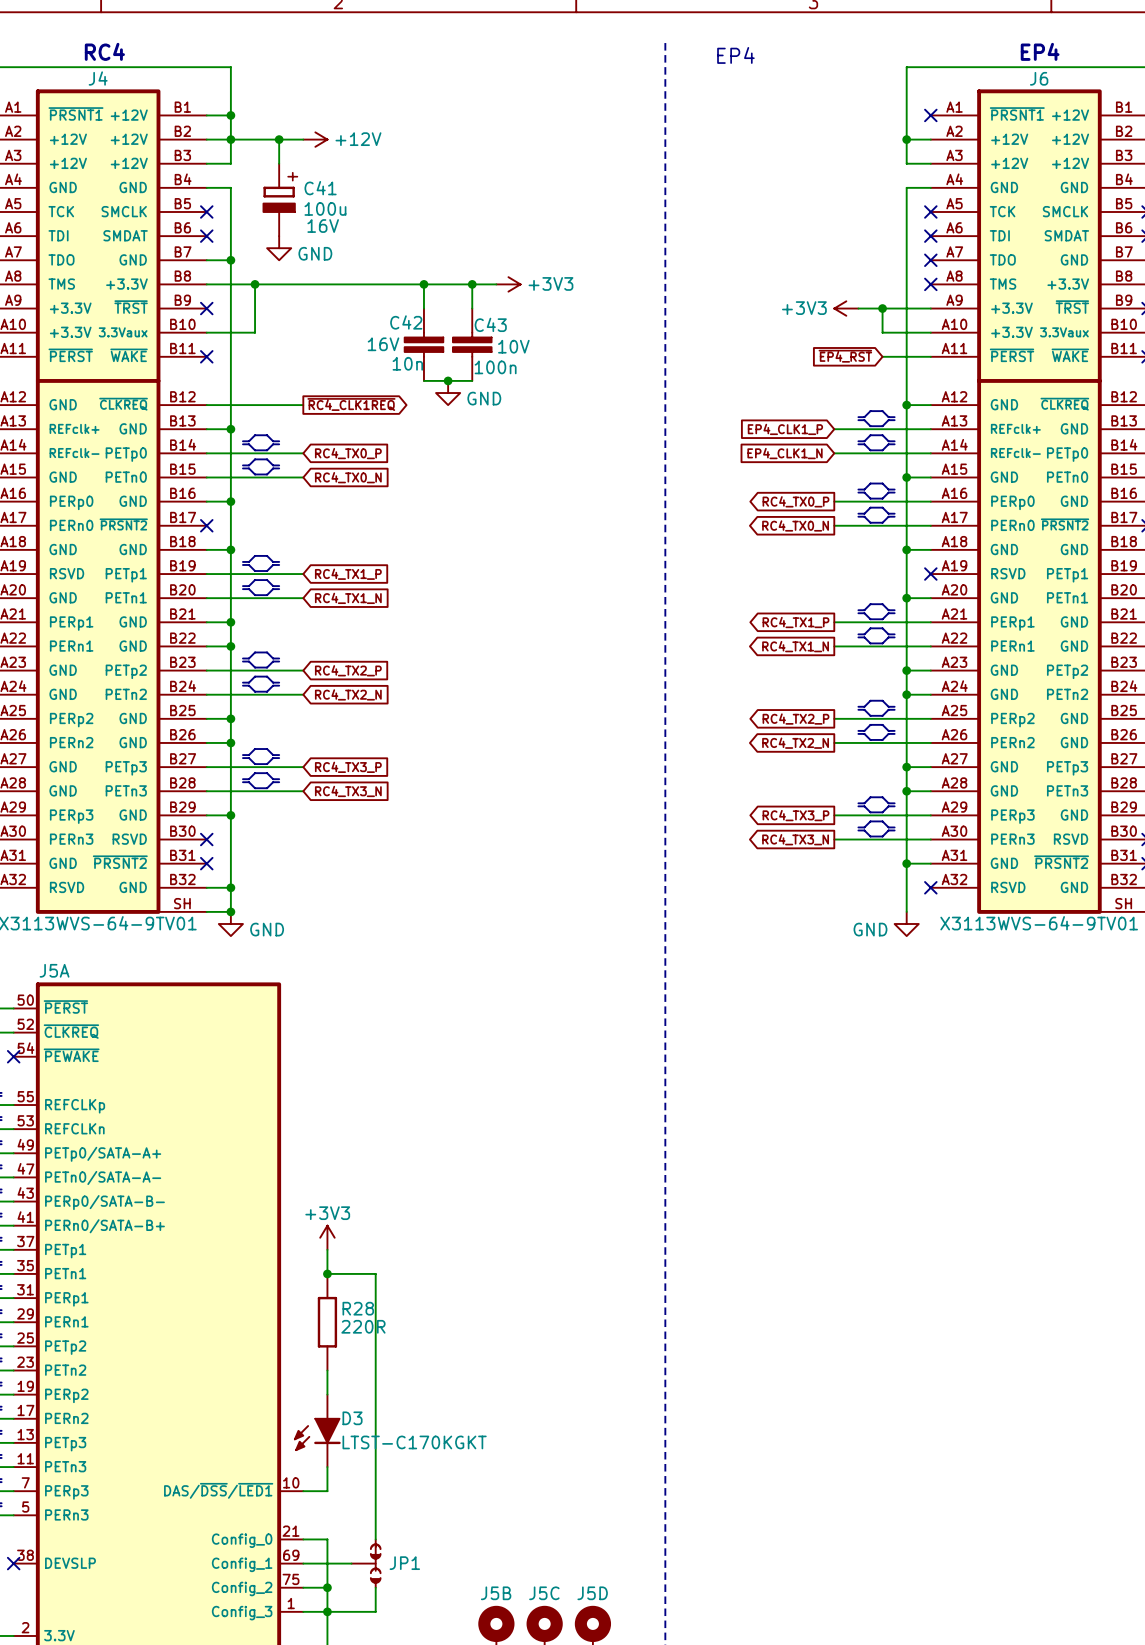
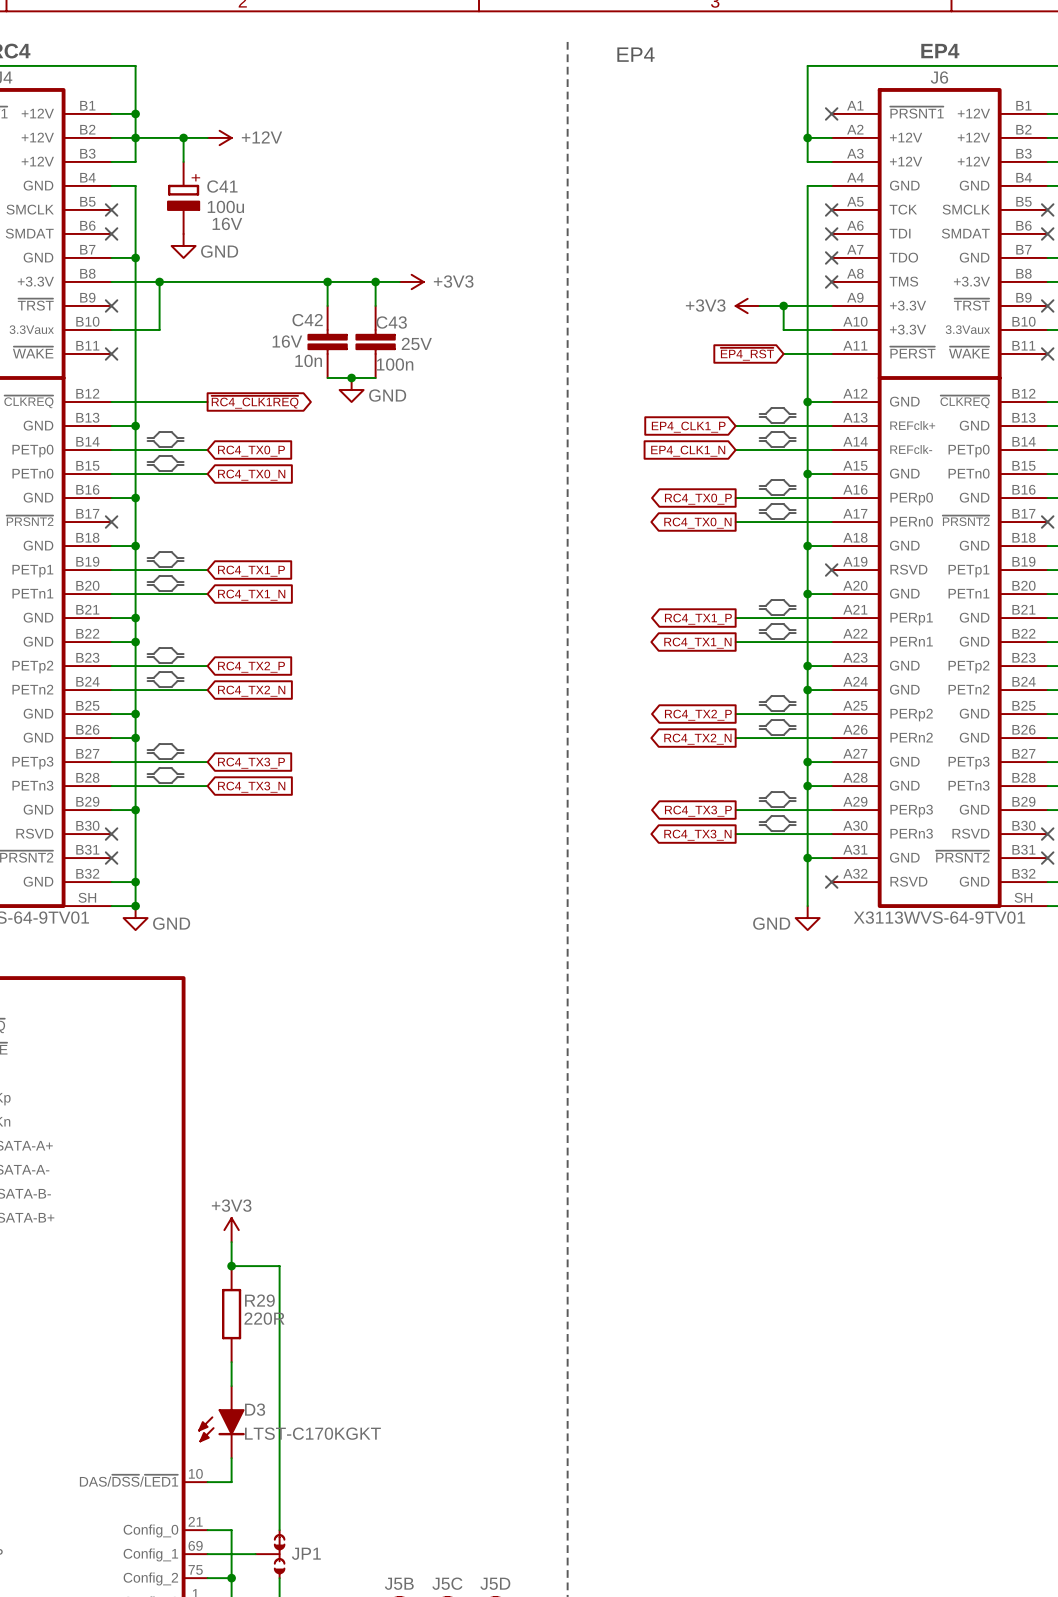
C43 text: 10V (513, 346) -> 25V (416, 343)
R28 name: R28 (358, 1308) -> R29 (259, 1300)

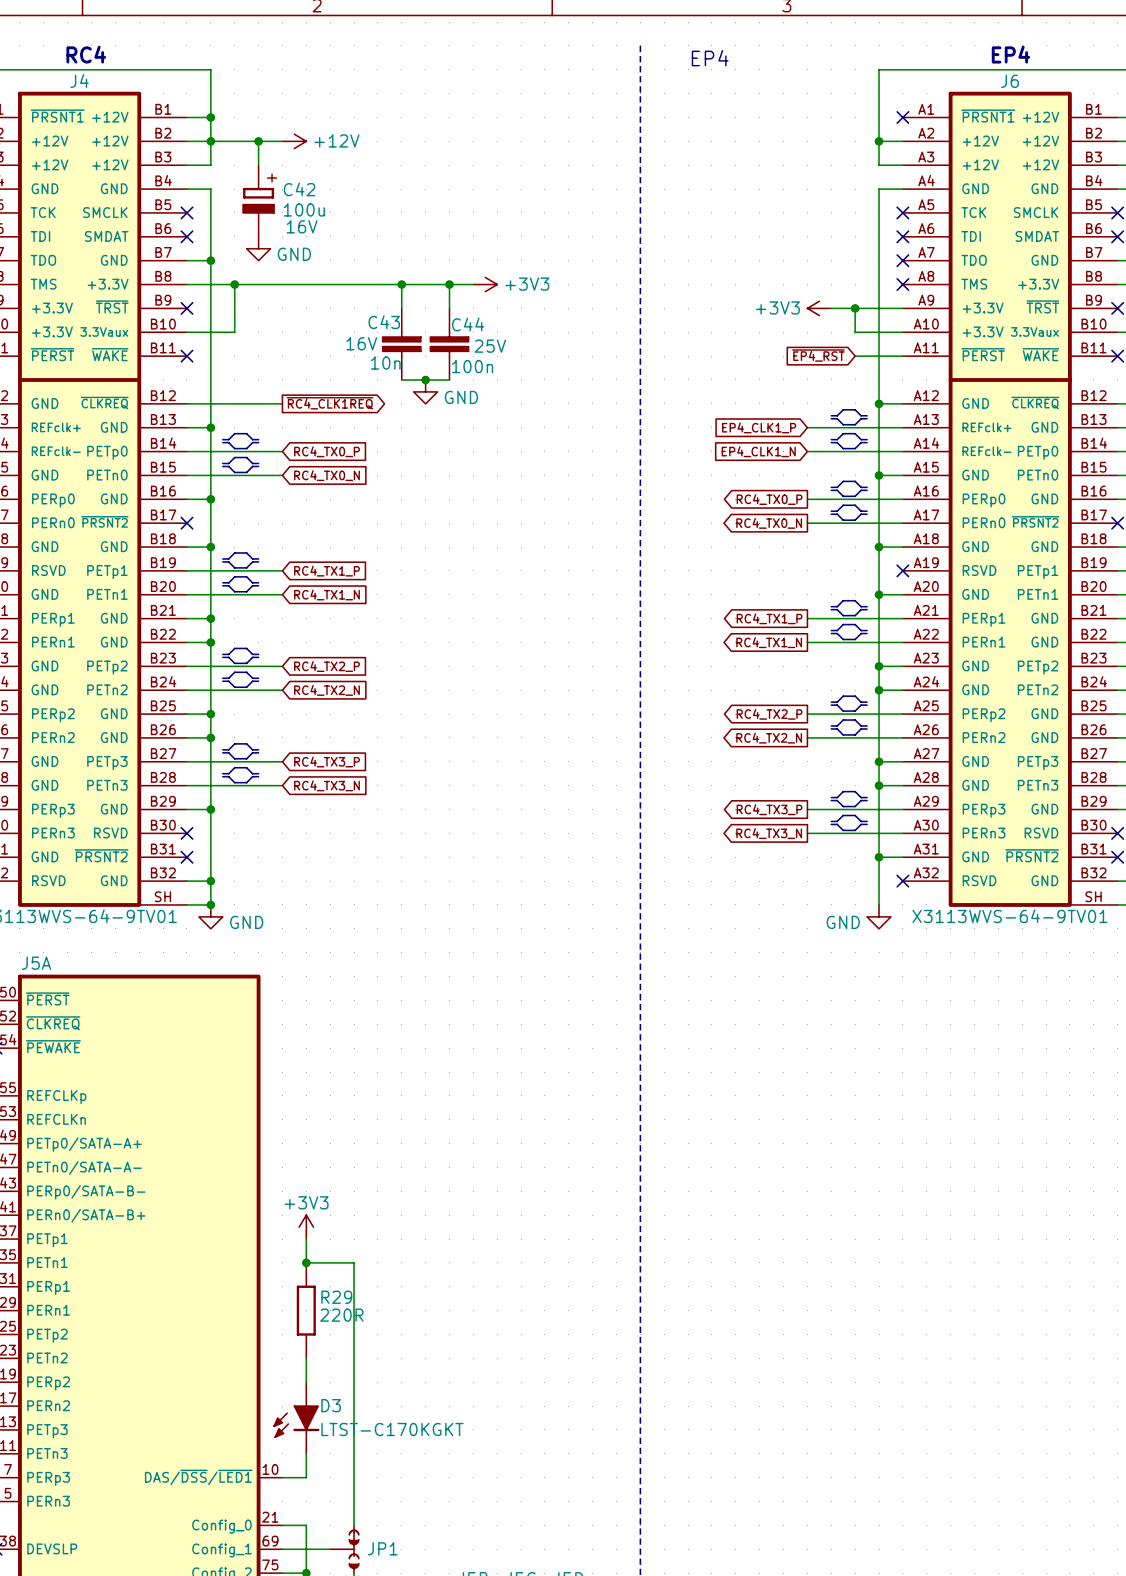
C41 name: C41 (222, 186) -> C42 (299, 189)
C42 name: C42 (307, 320) -> C43 (384, 322)
C43 name: C43 (391, 322) -> C44 (468, 324)

